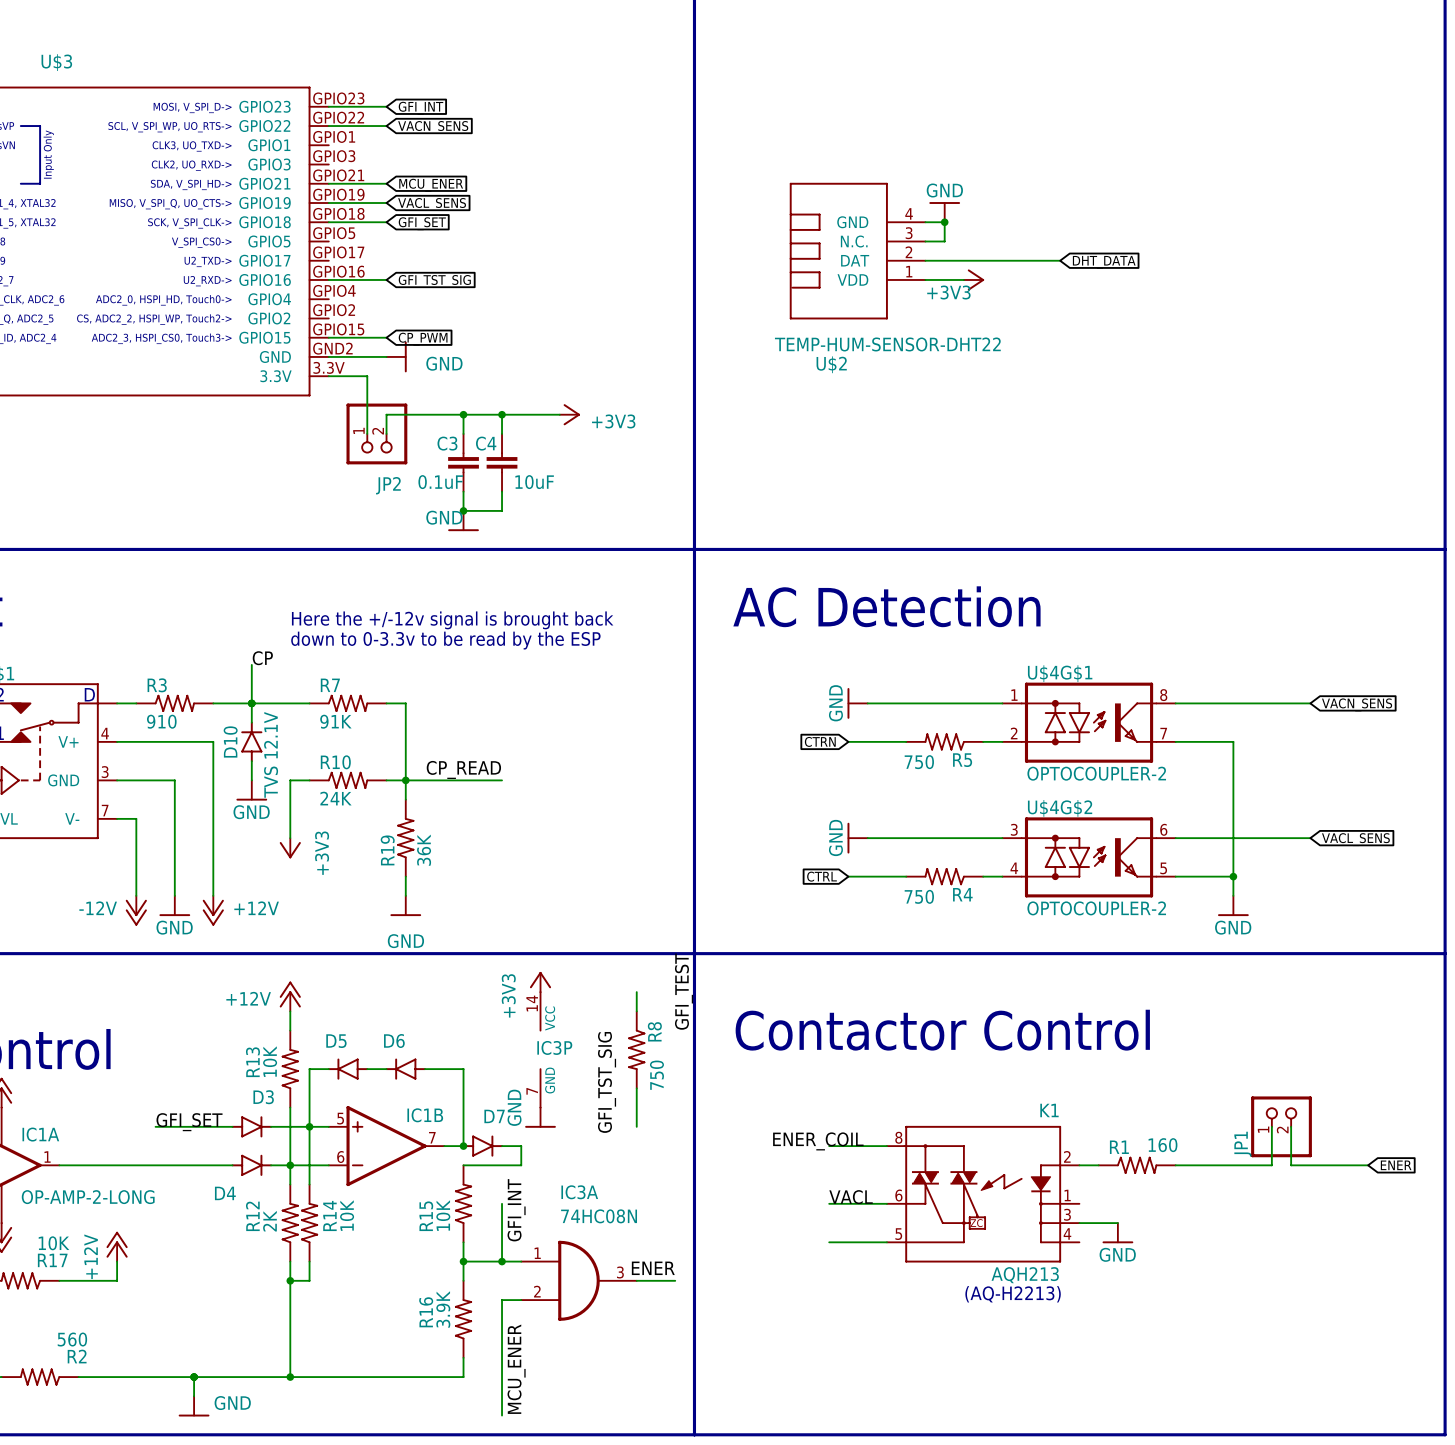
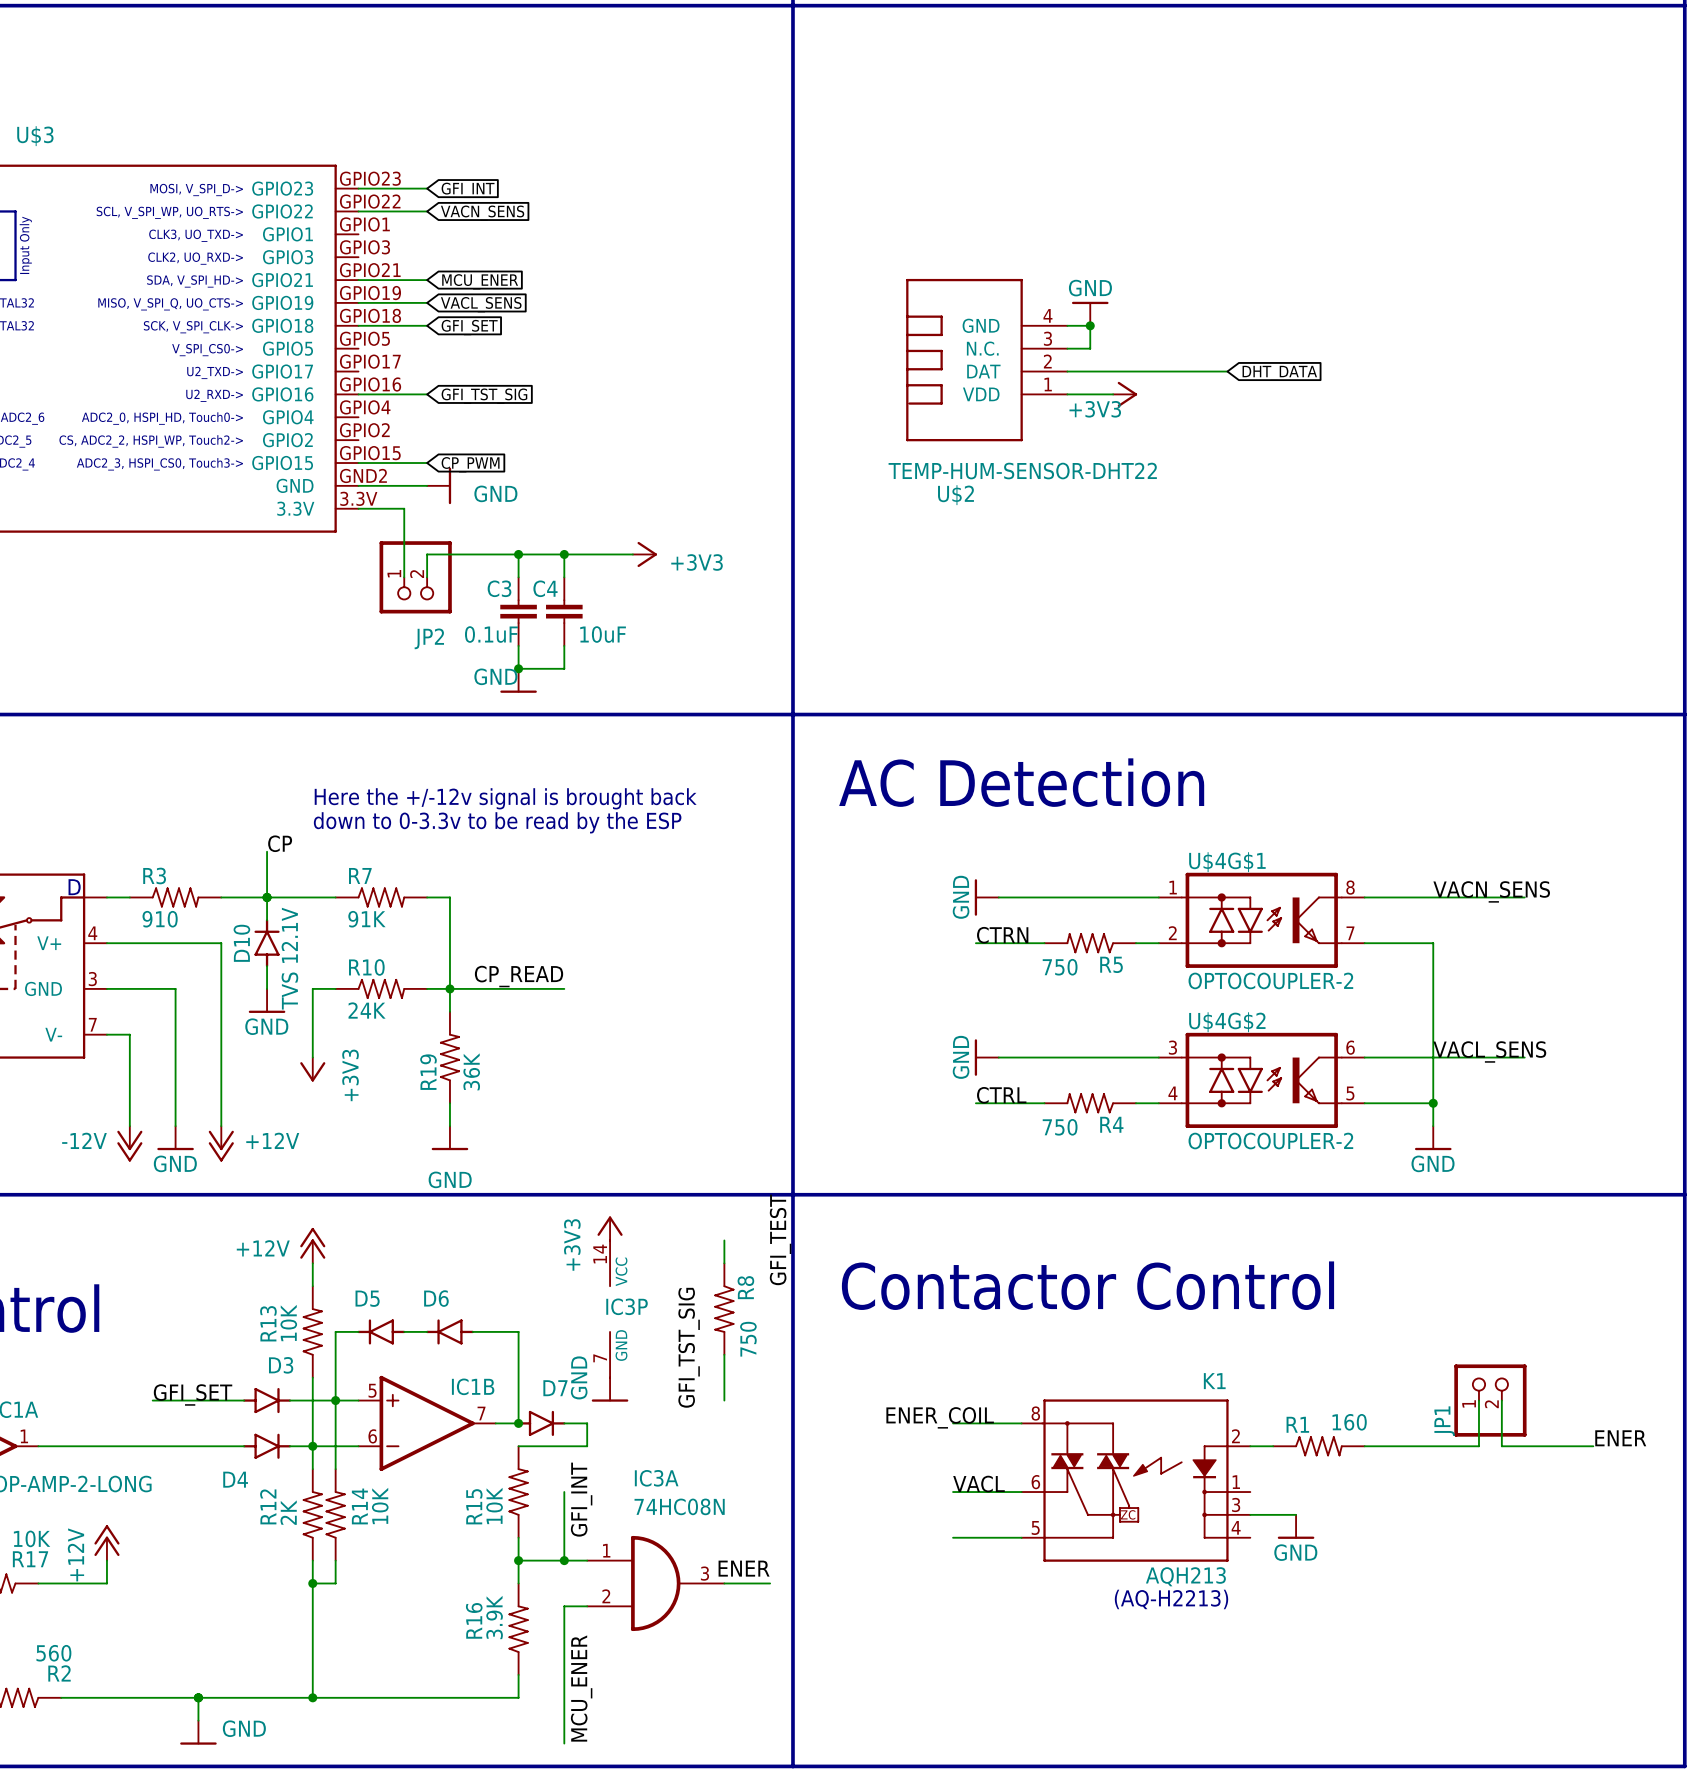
label: none -> VACN_SENS (1491, 891)
global label: VACN_SENS (1357, 704) -> none
label: none -> CTRN (1002, 935)
global label: CTRN (820, 741) -> none
label: none -> VACL_SENS (1489, 1051)
global label: VACL_SENS (1355, 839) -> none
label: none -> CTRL (1001, 1095)
global label: CTRL (821, 876) -> none
label: none -> ENER (1620, 1438)
global label: ENER (1396, 1165) -> none

